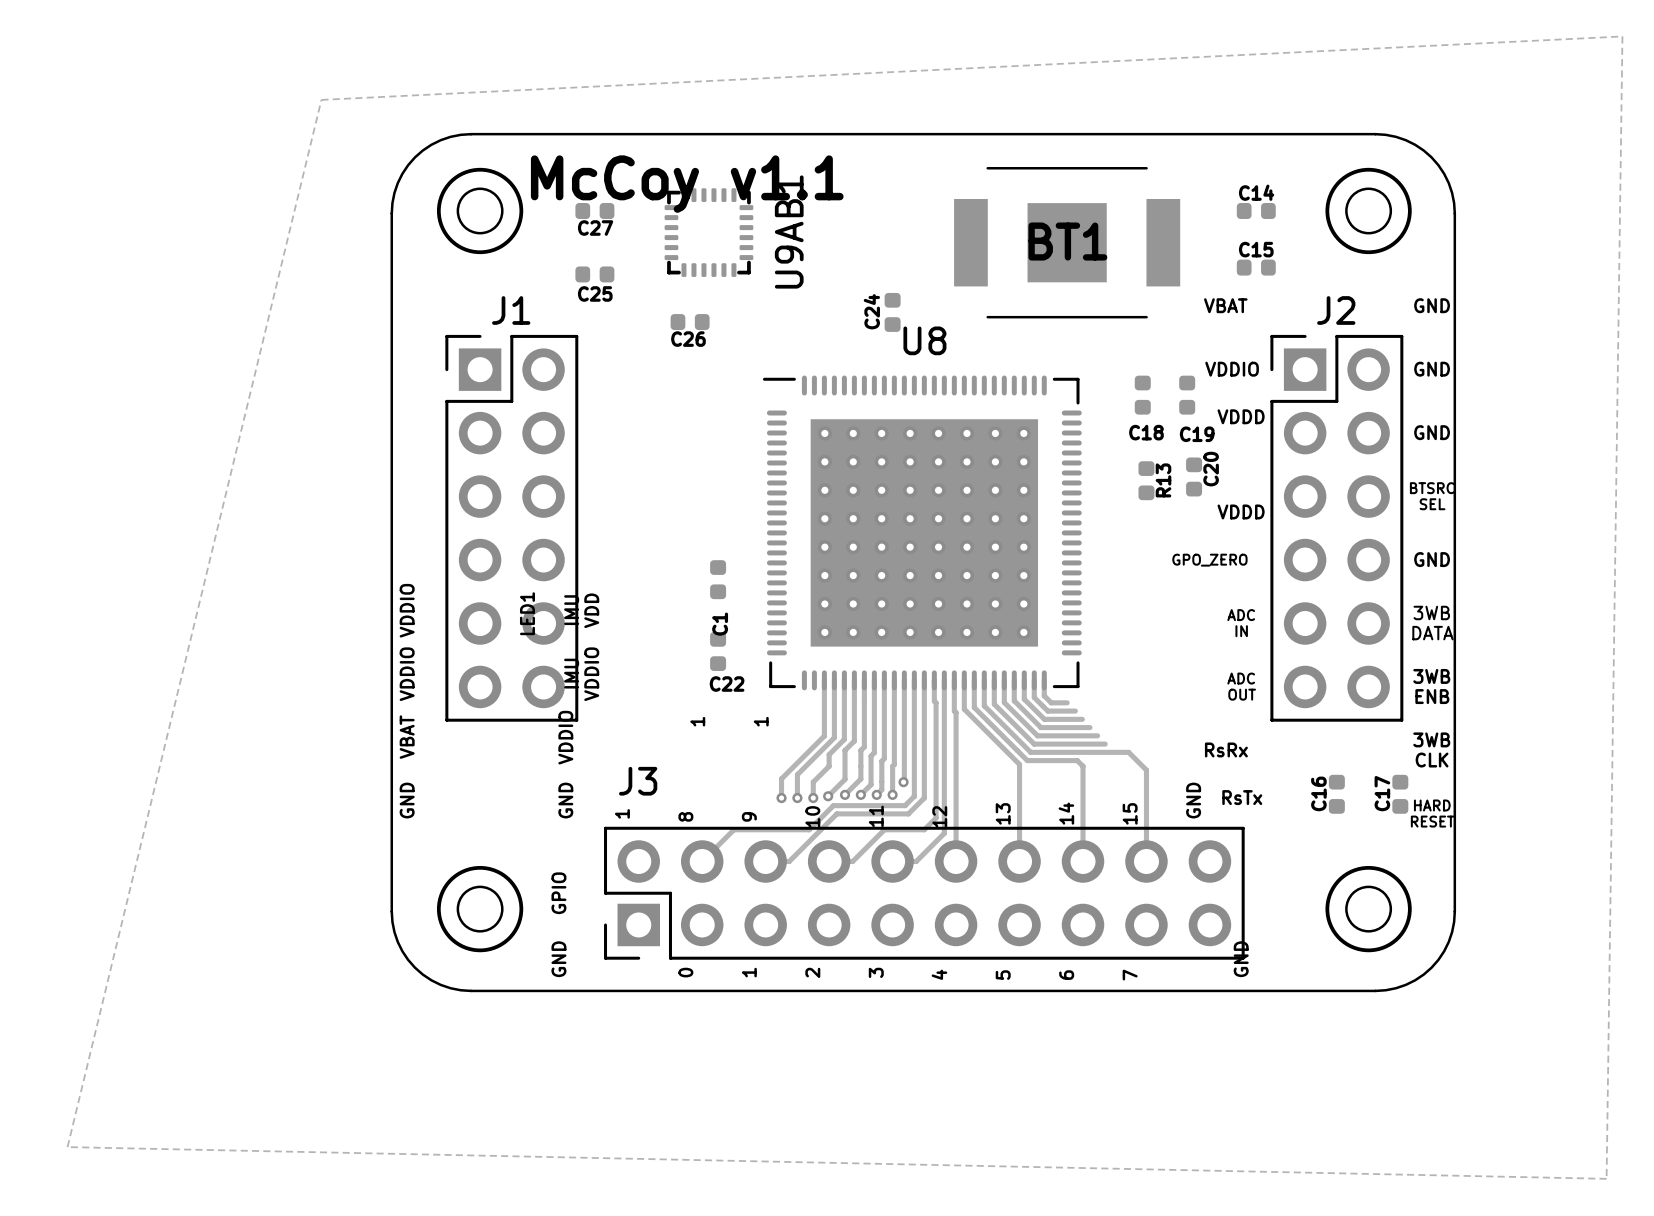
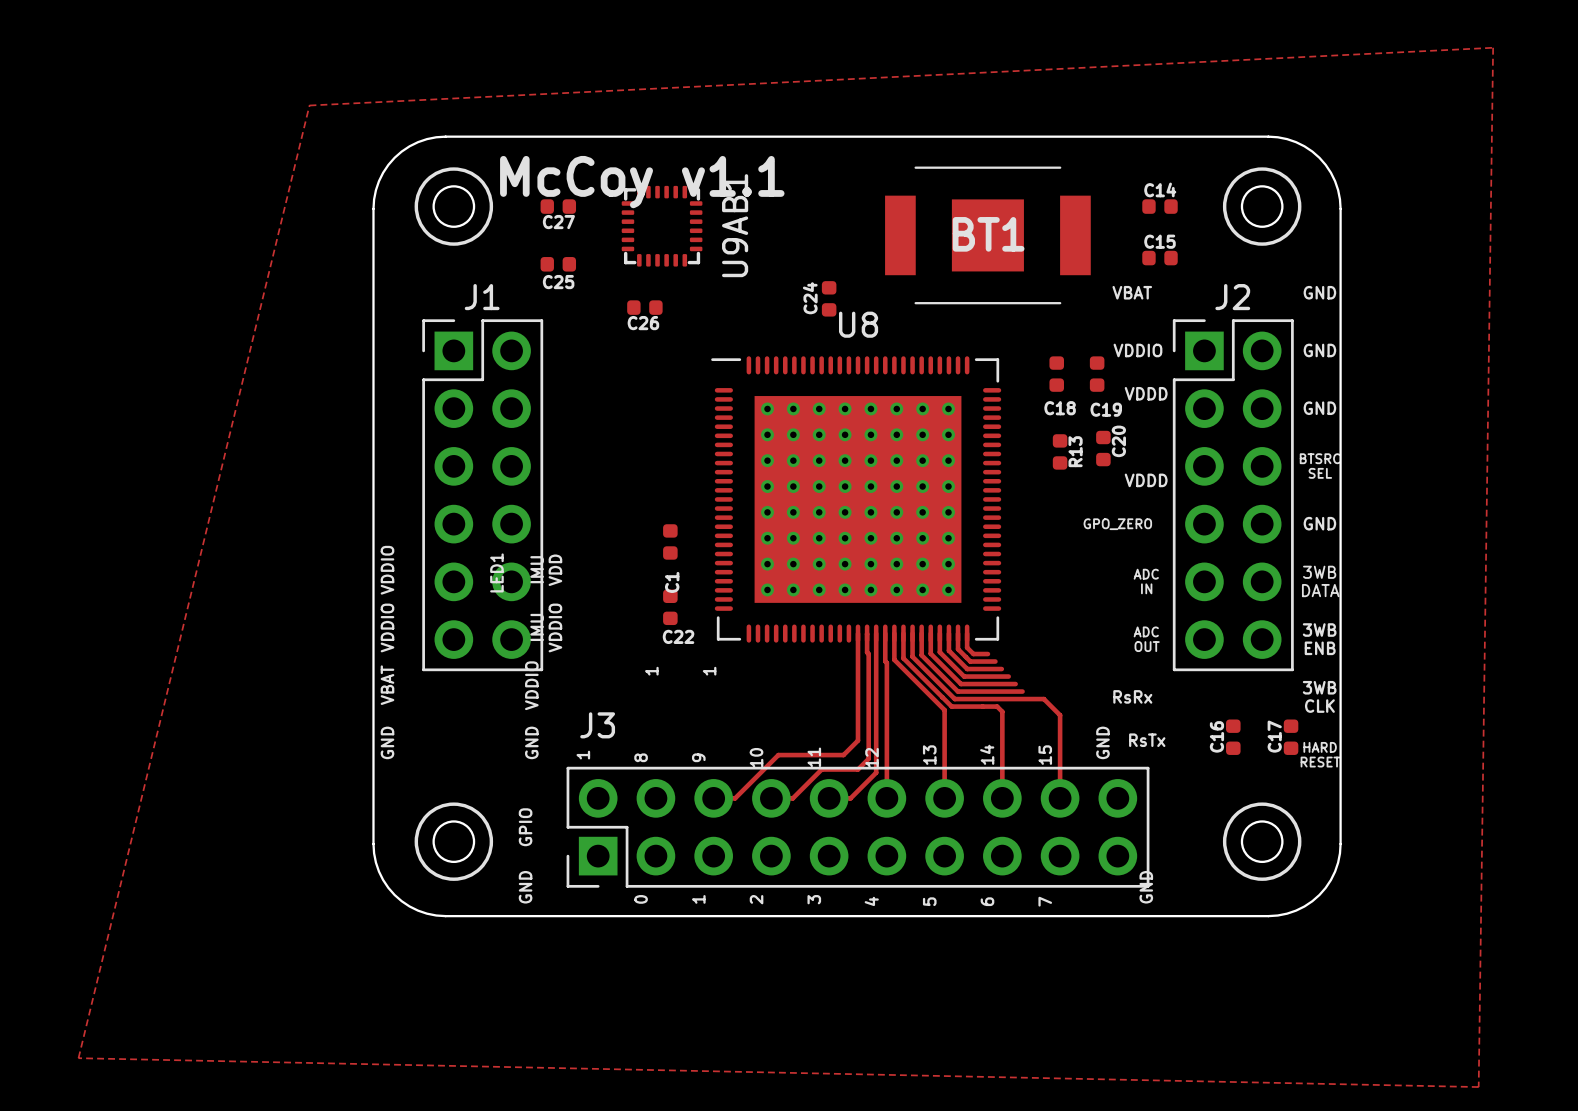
track: (824, 680) (824, 736) (781, 778) (781, 798) -> none
track: (834, 680) (834, 737) (797, 774) (797, 798) -> none
track: (844, 680) (844, 739) (829, 754) (829, 766) (813, 782) (813, 798) -> none
track: (854, 680) (854, 741) (845, 750) (845, 779) (828, 796) -> none
track: (864, 680) (864, 746) (860, 750) (860, 779) (845, 794) -> none
track: (874, 680) (874, 752) (871, 756) (871, 784) (860, 794) -> none
track: (884, 680) (884, 758) (881, 761) (881, 789) (876, 794) -> none
track: (894, 680) (892, 794) -> none
track: (904, 680) (903, 782) -> none
track: (914, 680) (914, 796) (905, 805) (833, 805) (809, 829) (733, 829) (702, 861) -> none
via: (903, 782) -> none
via: (845, 794) -> none
via: (860, 794) -> none
via: (876, 794) -> none
via: (892, 794) -> none
via: (828, 796) -> none
via: (781, 798) -> none
via: (797, 798) -> none
via: (813, 798) -> none

